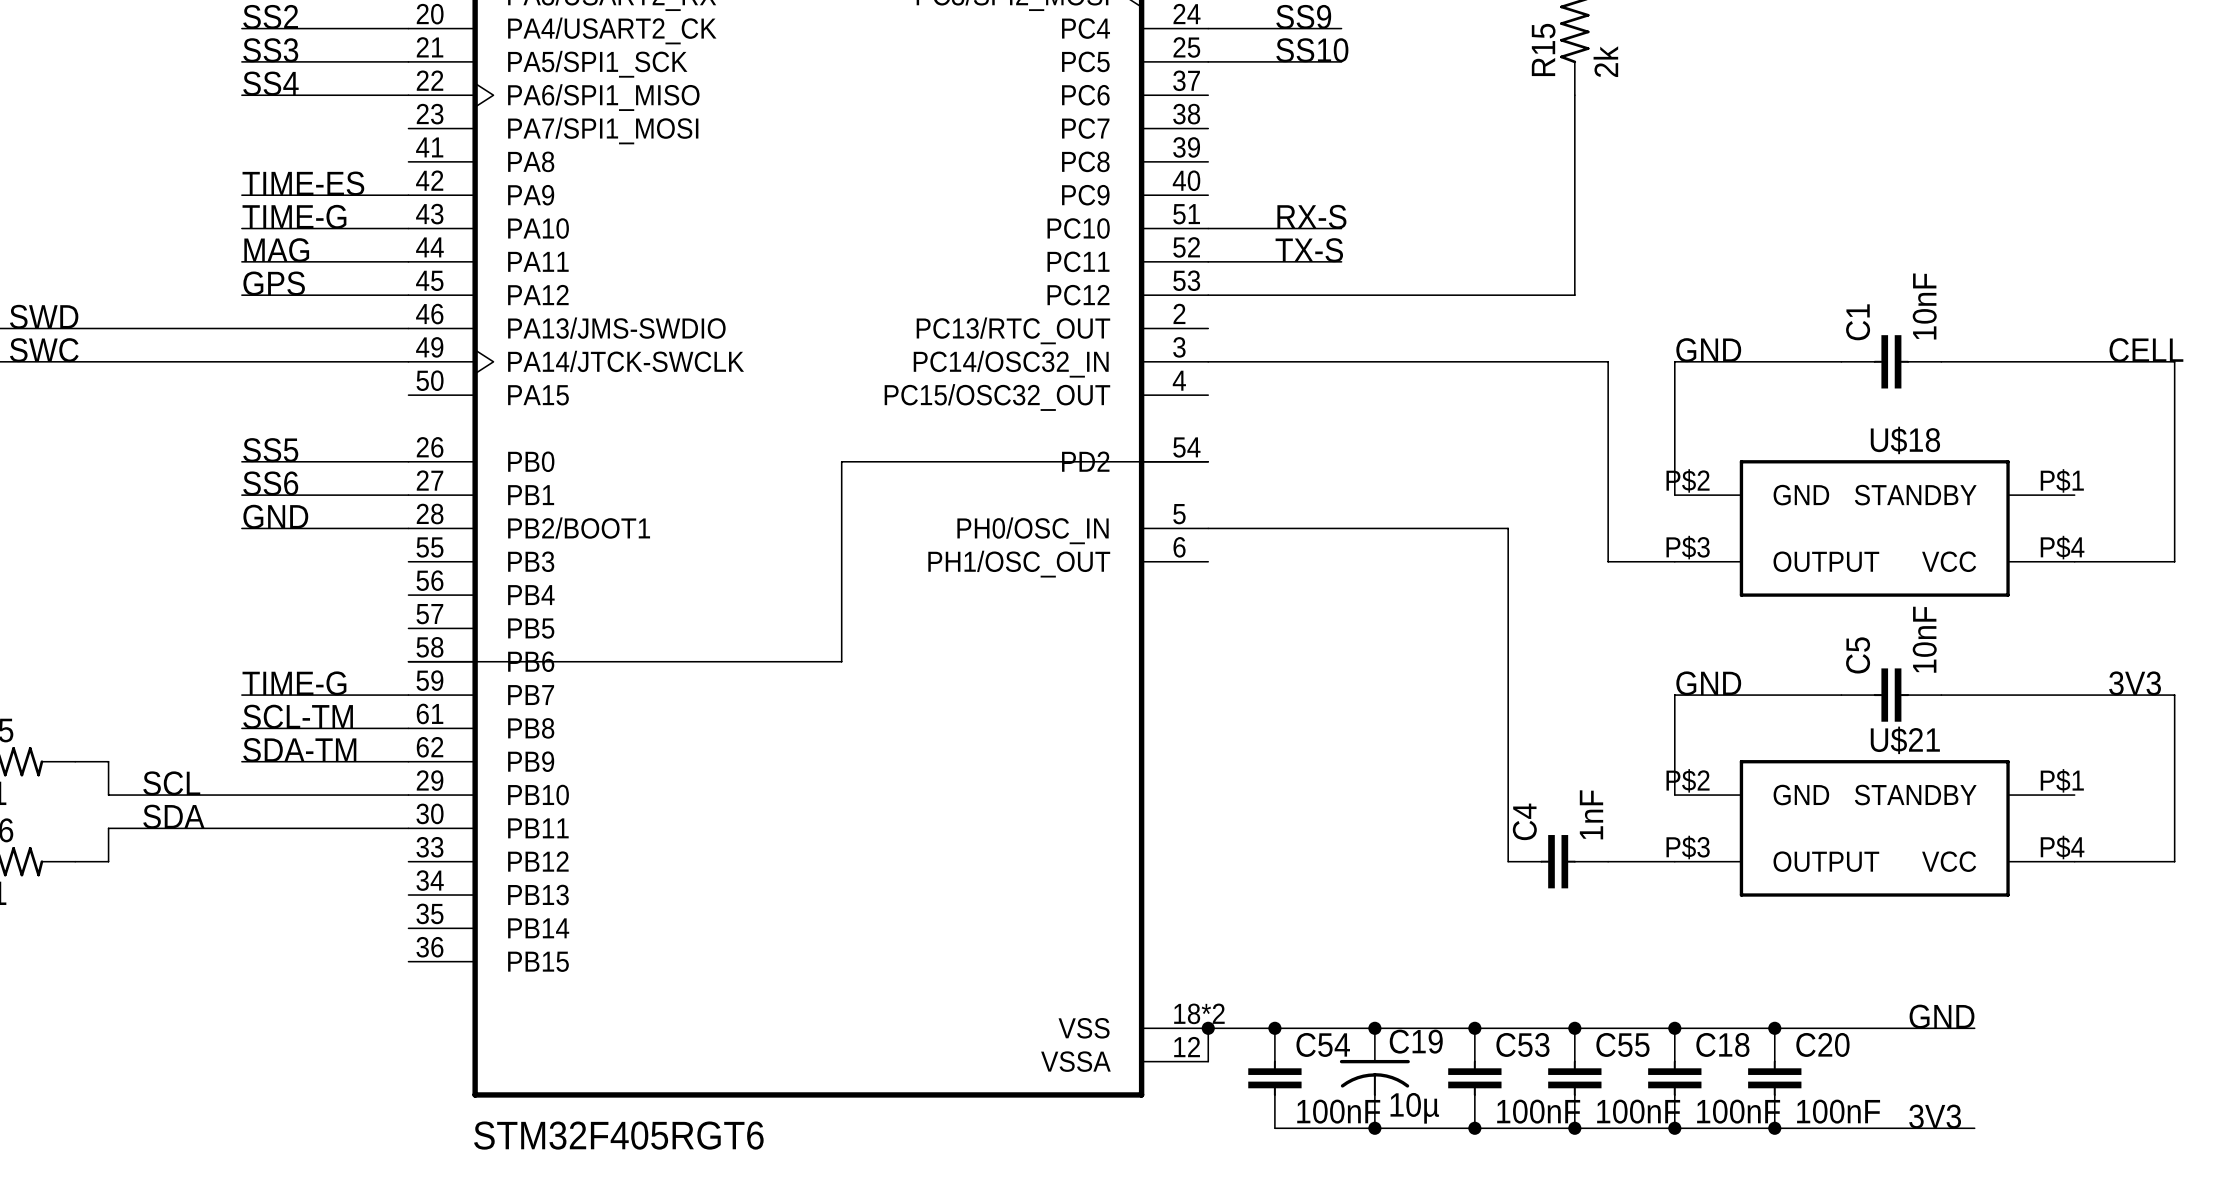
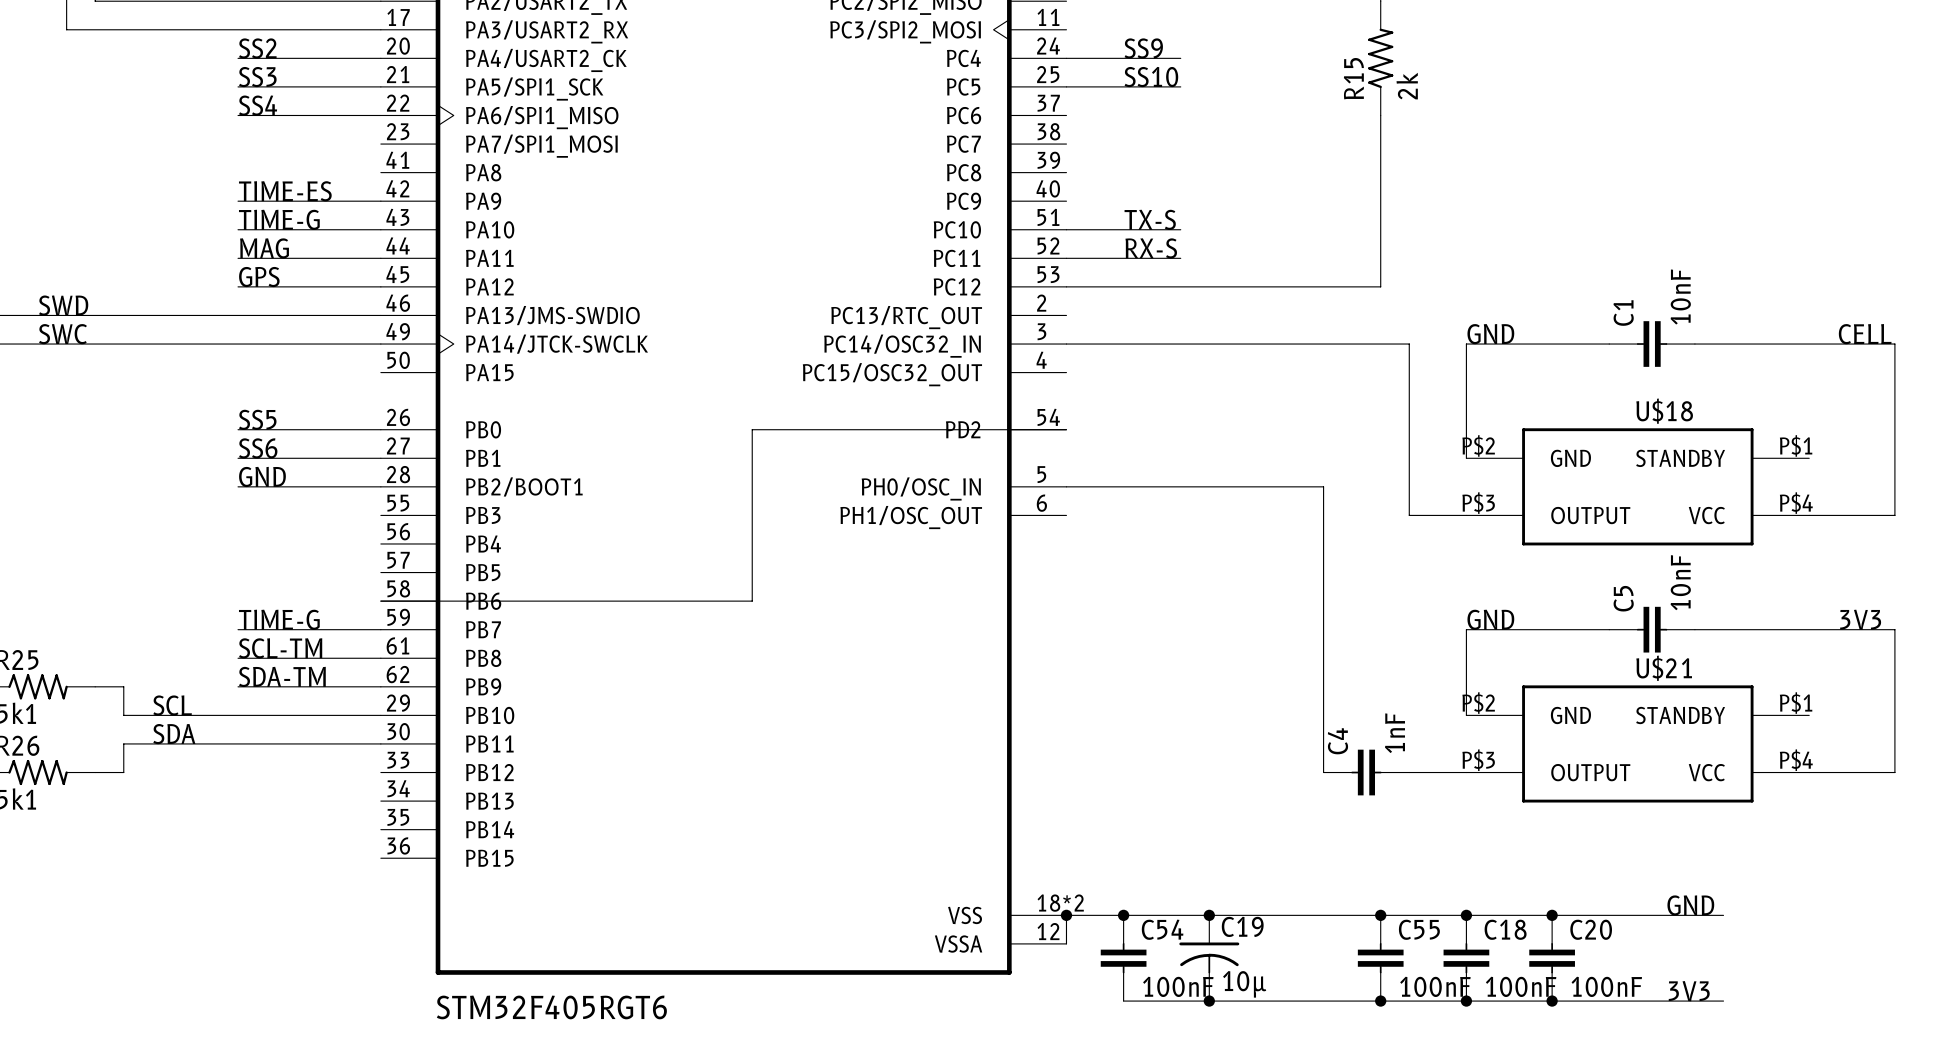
label: RX-S (1311, 216) -> TX-S (1150, 219)
label: TX-S (1309, 250) -> RX-S (1151, 248)
junction: (1474, 1028) -> none
C53: 100nF (1474, 1078) -> none
junction: (1474, 1128) -> none

